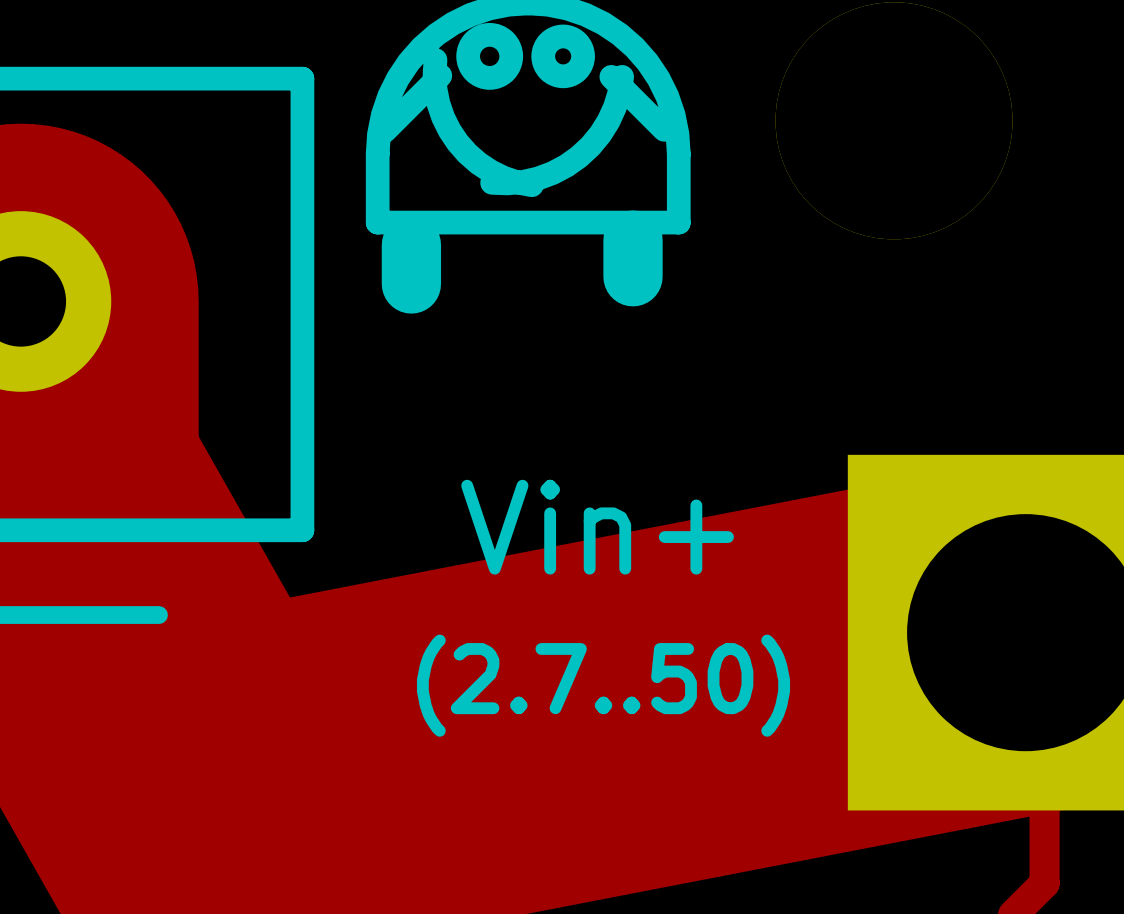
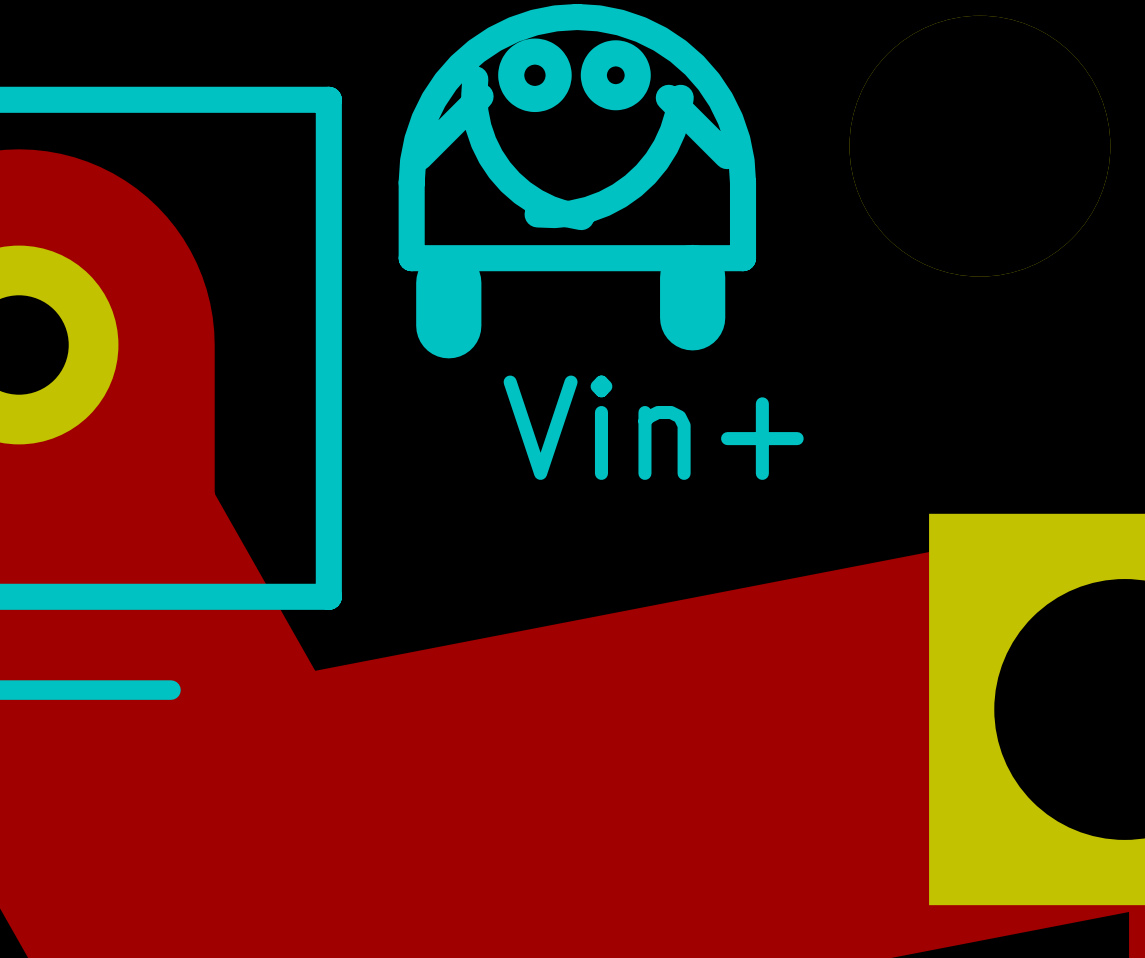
text position: Vin+ (597, 527) -> Vin+ (653, 427)
text: (2.7..50) (603, 685) -> none

